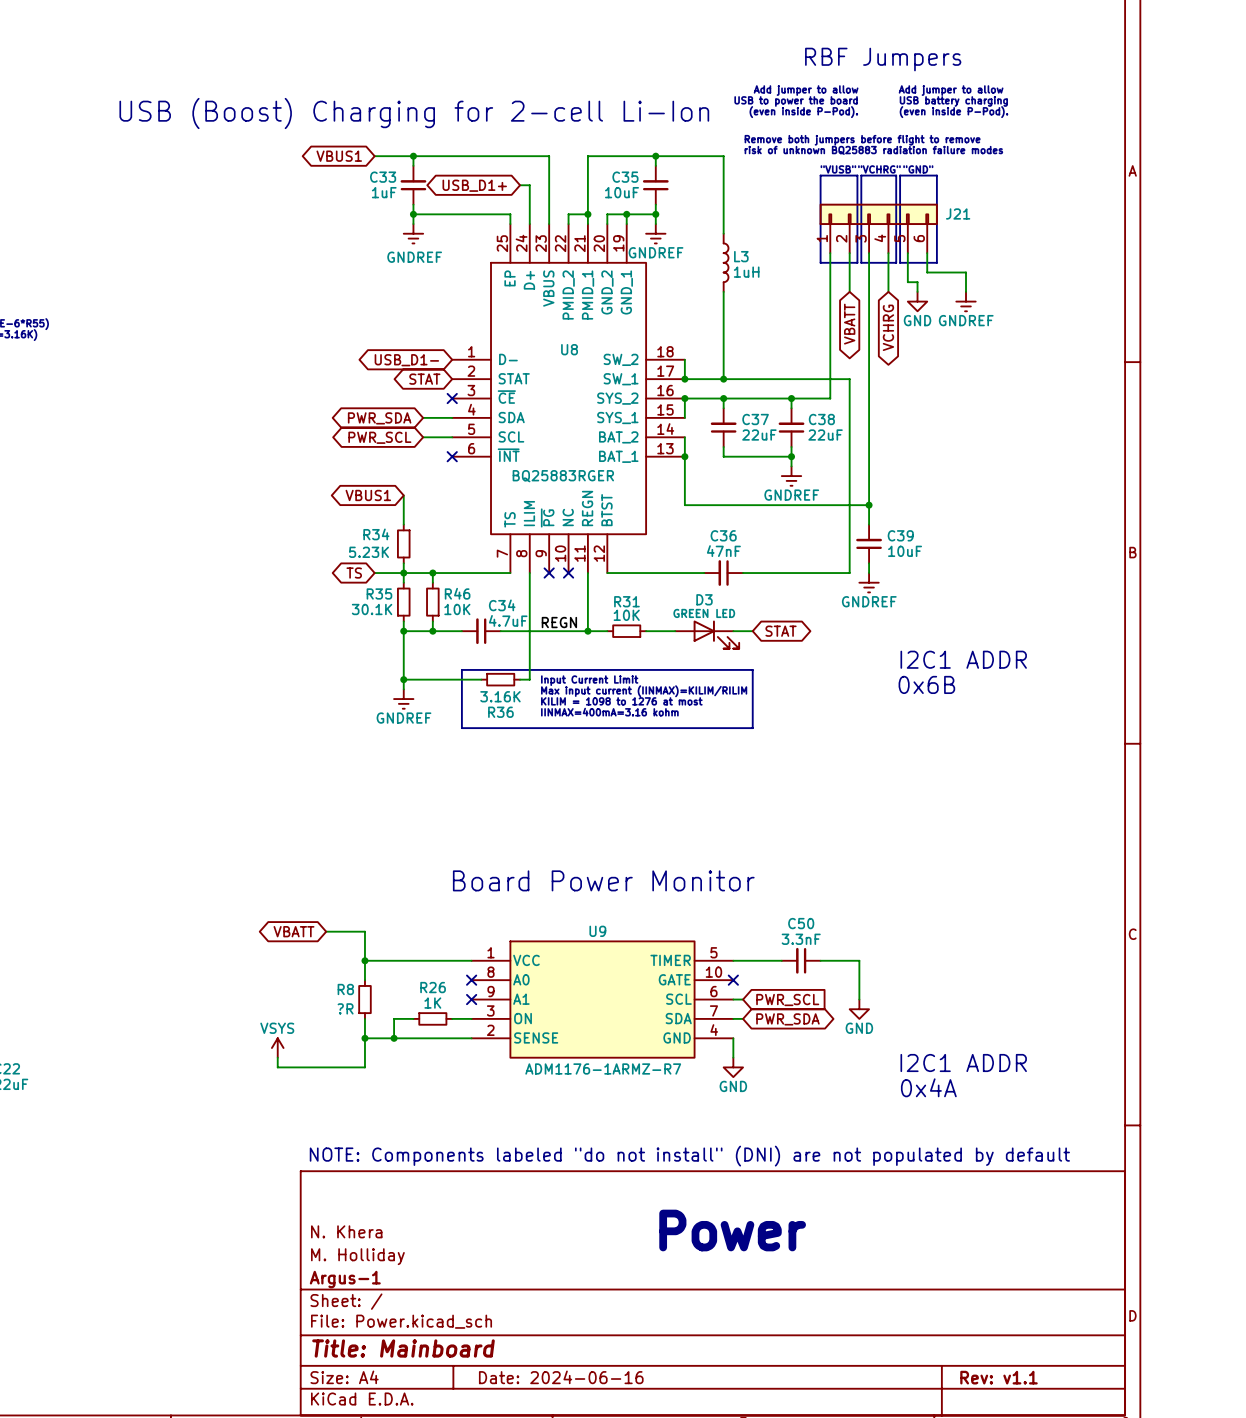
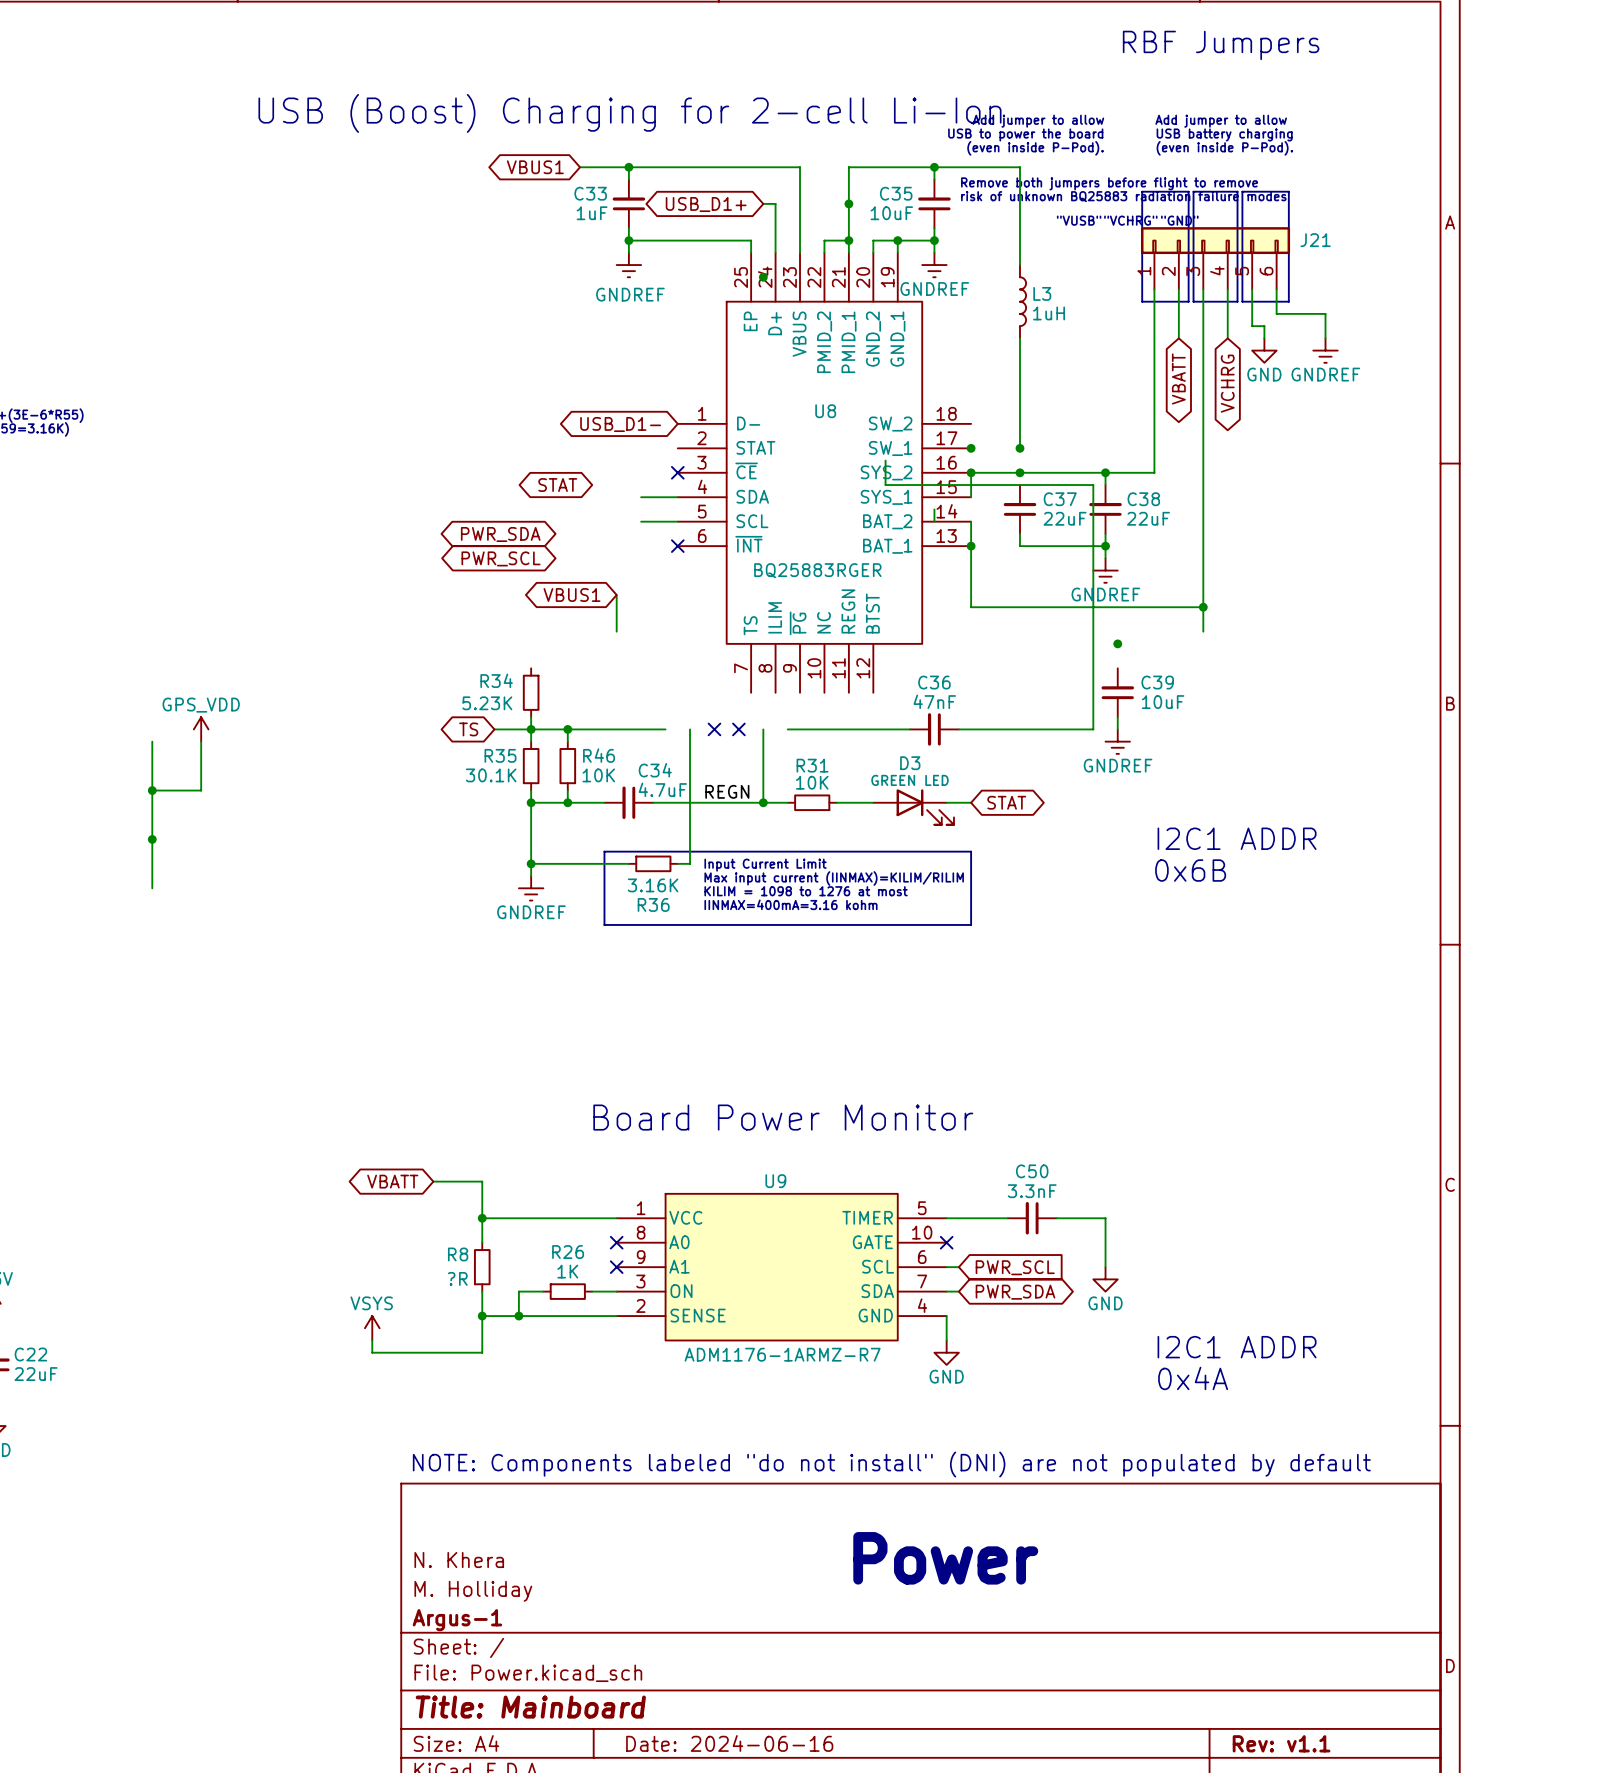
text position: RBF Jumpers (883, 59) -> RBF Jumpers (1221, 45)
text position: USB (Boost) Charging for 2-cell Li-Ion (414, 113) -> USB (Boost) Charging for 2-cell Li-Ion (629, 113)
junction: none -> (628, 167)
wire: none -> (934, 167) (934, 179)
junction: none -> (934, 167)
global label position: VBUS1 (339, 156) -> VBUS1 (535, 167)
wire: (374, 156) (549, 156) (549, 224) -> (580, 167) (800, 167) (800, 252)
wire: (413, 156) (413, 165) -> (628, 167) (628, 179)
junction: (413, 156) -> none
wire: (587, 156) (587, 224) -> none
wire: (597, 156) (723, 156) (723, 175) -> (775, 203) (775, 252)
wire: none -> (848, 203) (848, 167) (1019, 167) (1019, 265)
line: (820, 175) (857, 175) (857, 262) (820, 262) (820, 175) -> (1142, 191) (1188, 191) (1188, 301) (1142, 301) (1142, 191)
line: (861, 175) (896, 175) (896, 262) (861, 262) (861, 175) -> (1193, 191) (1237, 191) (1237, 301) (1193, 301) (1193, 191)
line: (900, 175) (936, 175) (936, 262) (900, 262) (900, 175) -> (1242, 191) (1288, 191) (1288, 301) (1242, 301) (1242, 191)
C33 position: (413, 185) -> (628, 203)
global label position: USB_D1+ (474, 185) -> USB_D1+ (706, 204)
wire: none -> (628, 240) (677, 240)
junction: none -> (628, 240)
wire: (529, 185) (529, 224) -> (690, 240) (751, 240) (751, 252)
junction: none -> (848, 240)
C35 position: (655, 185) -> (934, 203)
junction: none -> (897, 240)
junction: none -> (934, 240)
wire: (723, 194) (723, 233) -> none
wire: (413, 204) (413, 224) -> (628, 228) (628, 252)
wire: (413, 214) (510, 214) (510, 224) -> none
junction: (413, 214) -> none
wire: (587, 214) (568, 214) (568, 224) -> (848, 240) (824, 240) (824, 252)
wire: (626, 214) (626, 224) -> (897, 240) (897, 252)
junction: (626, 214) -> none
wire: (655, 214) (607, 214) (607, 224) -> (934, 240) (873, 240) (873, 252)
junction: (655, 214) -> none
J21 position: (878, 228) -> (1215, 258)
power symbol position: GNDREF (413, 233) -> GNDREF (628, 265)
power symbol position: GNDREF (655, 233) -> GNDREF (934, 265)
wire: (830, 253) (830, 398) (684, 398) (684, 417) -> (1154, 289) (1154, 472) (971, 472) (971, 497)
wire: (849, 253) (849, 291) -> (1178, 289) (1178, 338)
wire: (869, 253) (869, 524) -> (1203, 289) (1203, 631)
wire: (888, 253) (888, 291) -> (1227, 289) (1227, 338)
wire: (907, 253) (907, 282) (917, 282) (917, 291) -> (1252, 289) (1252, 326) (1264, 326) (1264, 338)
wire: (927, 253) (927, 272) (966, 272) (966, 291) -> (1276, 289) (1276, 313) (1325, 313) (1325, 338)
L3 position: (726, 262) -> (1023, 301)
wire: (723, 291) (723, 379) -> (1019, 338) (1019, 448)
power symbol position: GND (917, 301) -> GND (1264, 350)
power symbol position: GNDREF (966, 301) -> GNDREF (1325, 350)
global label position: VBATT (849, 324) -> VBATT (1178, 378)
global label position: VCHRG (888, 327) -> VCHRG (1227, 383)
junction: none -> (971, 448)
junction: none -> (1019, 448)
global label position: USB_D1- (406, 360) -> USB_D1- (620, 424)
no-connect mark: none -> (677, 472)
junction: none -> (971, 472)
junction: none -> (1019, 472)
junction: none -> (1105, 472)
junction: (684, 379) -> none
junction: (723, 379) -> none
no-connect mark: (452, 398) -> none
U8 position: (568, 398) -> (824, 472)
junction: (684, 398) -> none
junction: (723, 398) -> none
junction: (791, 398) -> none
wire: (423, 417) (452, 417) -> (641, 497) (677, 497)
no-connect mark: none -> (677, 546)
C37 position: (723, 427) -> (1019, 509)
junction: none -> (971, 546)
C38 position: (791, 427) -> (1105, 509)
junction: none -> (1105, 546)
wire: (423, 437) (452, 437) -> (641, 521) (677, 521)
wire: (684, 437) (684, 505) (869, 505) -> (971, 521) (971, 607) (1203, 607)
wire: (723, 447) (723, 456) (791, 456) -> (1019, 533) (1019, 546) (1105, 546)
wire: (791, 447) (791, 466) -> (1105, 533) (1105, 558)
no-connect mark: (452, 456) -> none
junction: (684, 456) -> none
junction: (791, 456) -> none
power symbol position: GNDREF (791, 476) -> GNDREF (1105, 570)
junction: none -> (1203, 607)
global label position: VBUS1 (368, 495) -> VBUS1 (572, 595)
wire: (403, 495) (403, 524) -> (616, 595) (616, 631)
power symbol: none -> GPS_VDD (201, 729)
wire: none -> (152, 741) (152, 888)
wire: none -> (201, 741) (201, 790) (152, 790)
junction: none -> (152, 790)
junction: none -> (152, 839)

